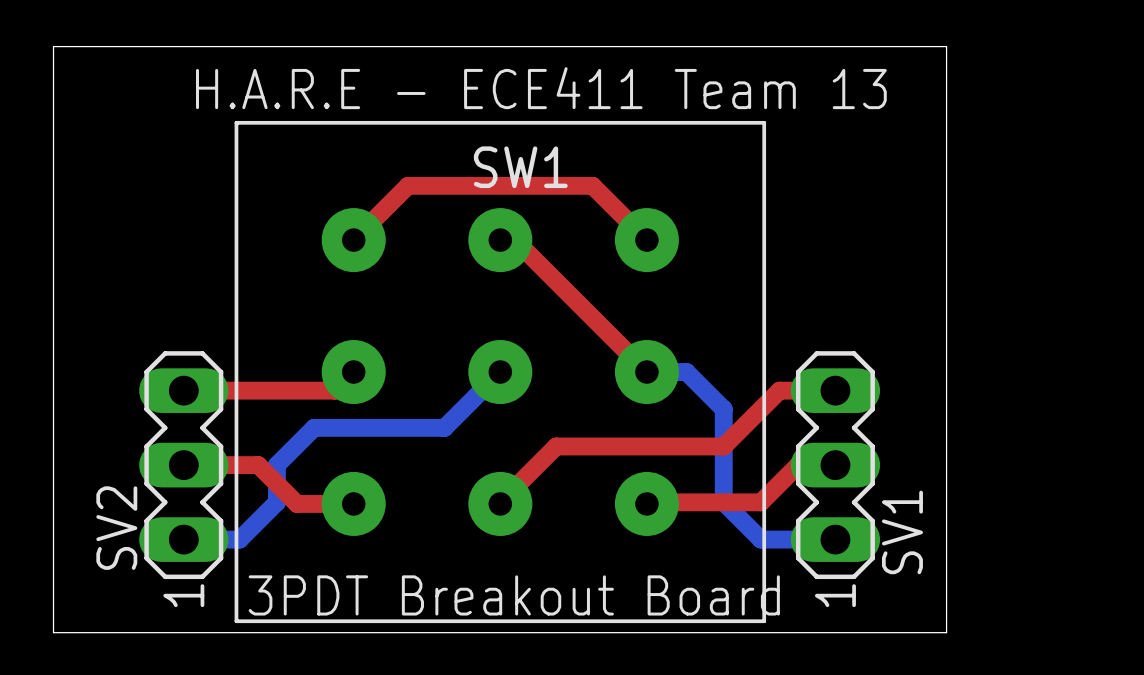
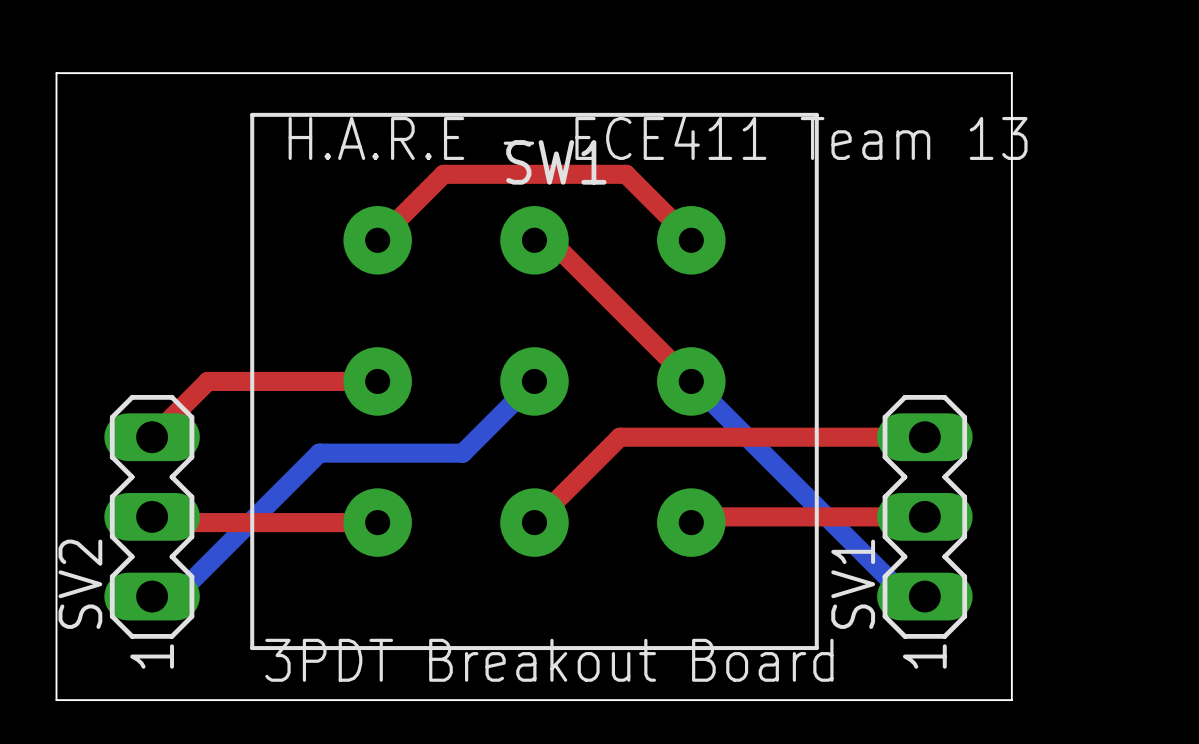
text position: H.A.R.E - ECE411 Team 13 (541, 88) -> H.A.R.E - ECE411 Team 13 (658, 137)
top track: none -> (377, 240) (443, 174) (626, 174) (691, 240)
top track: (353, 240) (407, 185) (592, 185) (646, 240) -> none
top track: (500, 240) (514, 240) (646, 372) -> (534, 240) (550, 240) (691, 381)
top track: none -> (377, 381) (207, 381) (152, 437)
bottom track: none -> (534, 381) (462, 453) (319, 453) (175, 596) (152, 596)
bottom track: none -> (691, 381) (906, 596) (924, 596)
top track: (353, 372) (335, 390) (183, 390) -> none
bottom track: (500, 372) (444, 427) (314, 427) (276, 465) (276, 502) (239, 539) (183, 539) -> none
SW1 position: (500, 372) -> (534, 381)
bottom track: (646, 372) (686, 372) (723, 409) (723, 502) (760, 539) (835, 539) -> none
top track: none -> (924, 437) (619, 437) (534, 522)
top track: (835, 390) (779, 390) (723, 446) (556, 446) (500, 503) -> none
top track: none -> (152, 516) (157, 522) (377, 522)
top track: none -> (924, 516) (697, 516) (691, 522)
top track: (183, 465) (258, 465) (297, 503) (353, 503) -> none
SV2 position: (183, 465) -> (152, 516)
top track: (835, 465) (798, 465) (760, 502) (648, 502) (646, 503) -> none
SV1 position: (835, 465) -> (924, 516)
SV1 name position: SV1 (902, 532) -> SV1 (853, 584)

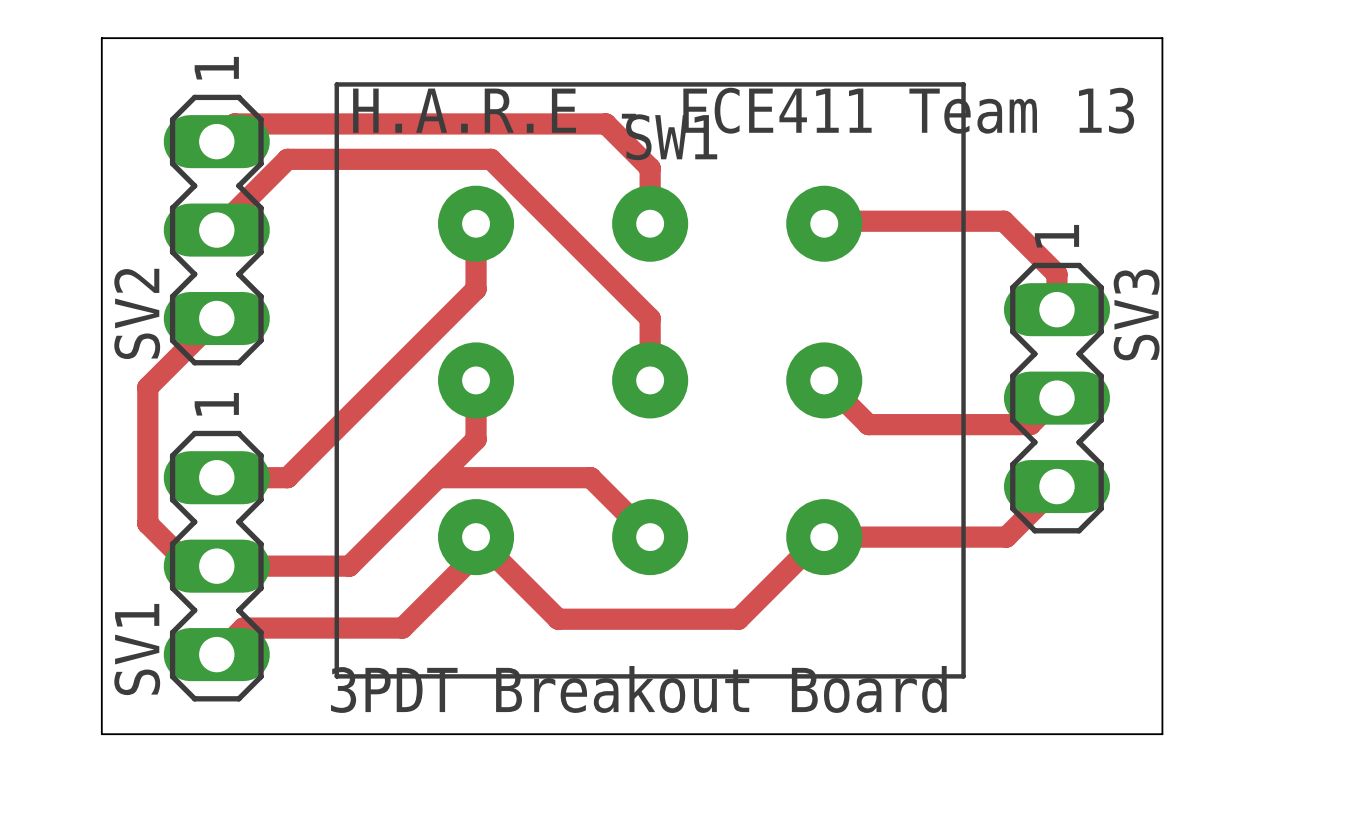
top track: none -> (216, 141) (234, 123) (605, 123) (650, 168) (650, 223)
top track: (377, 240) (443, 174) (626, 174) (691, 240) -> none
top track: none -> (476, 223) (476, 289) (287, 477) (216, 477)
top track: (534, 240) (550, 240) (691, 381) -> none
top track: none -> (824, 223) (826, 221) (1003, 221) (1056, 274) (1056, 309)
top track: none -> (216, 230) (287, 159) (490, 159) (650, 318) (650, 380)
top track: none -> (216, 318) (147, 387) (147, 523) (190, 566) (349, 566) (476, 439) (476, 380)
top track: (377, 381) (207, 381) (152, 437) -> none
bottom track: (534, 381) (462, 453) (319, 453) (175, 596) (152, 596) -> none
SW1 position: (534, 381) -> (650, 380)
bottom track: (691, 381) (906, 596) (924, 596) -> none
top track: none -> (824, 380) (868, 424) (1030, 424) (1056, 398)
SV3: none -> (1056, 398)
top track: (924, 437) (619, 437) (534, 522) -> none
top track: none -> (437, 477) (590, 477) (650, 537)
top track: none -> (1056, 486) (1006, 537) (820, 537) (738, 619) (558, 619) (476, 537) (476, 554) (402, 628) (243, 628) (216, 654)
top track: (152, 516) (157, 522) (377, 522) -> none
SV2 position: (152, 516) -> (216, 230)
top track: (924, 516) (697, 516) (691, 522) -> none
SV1 position: (924, 516) -> (216, 566)
SV2 text position: 1 (152, 656) -> 1 (216, 68)
SV1 text position: 1 (924, 656) -> 1 (216, 404)

